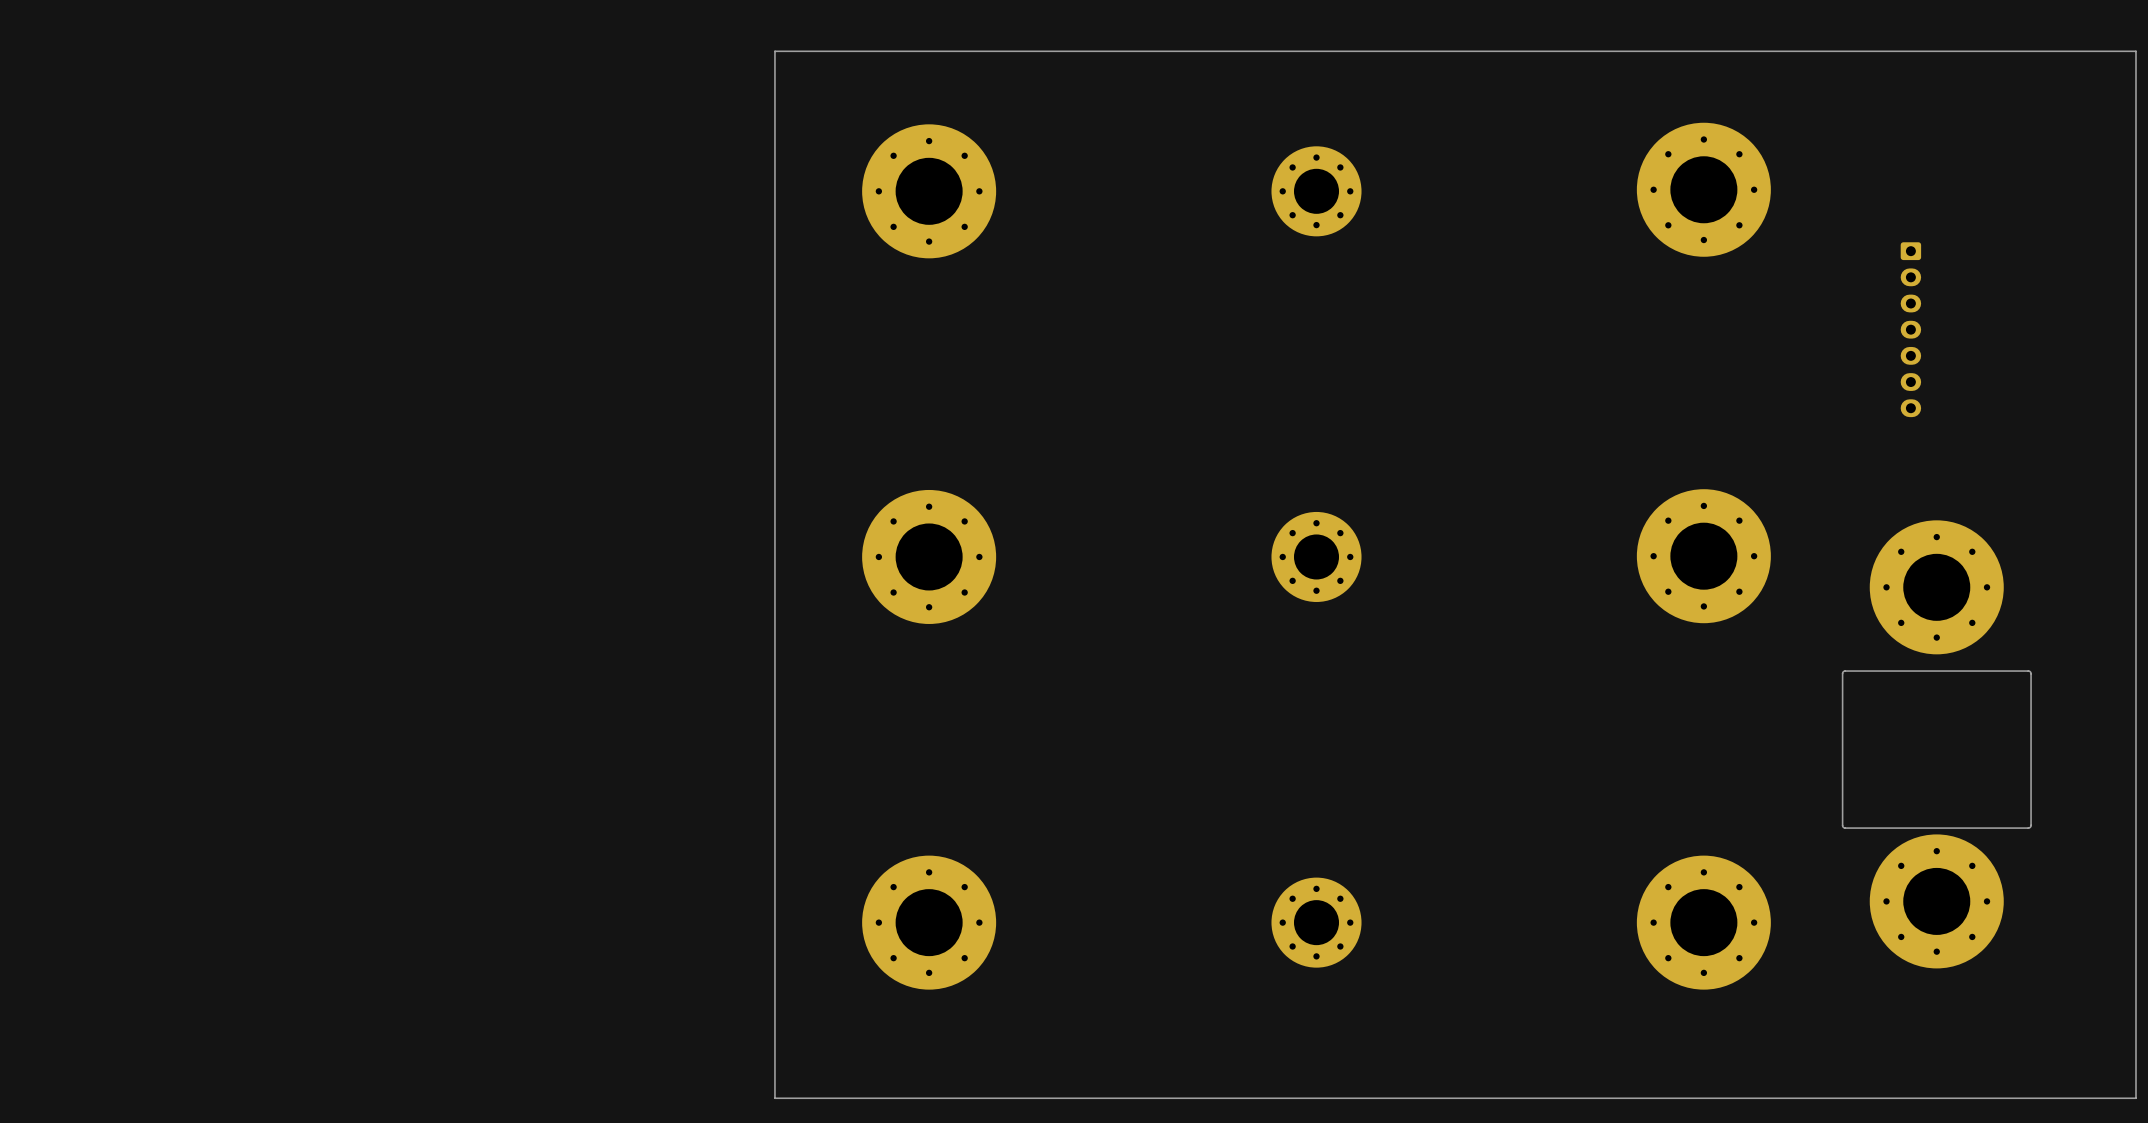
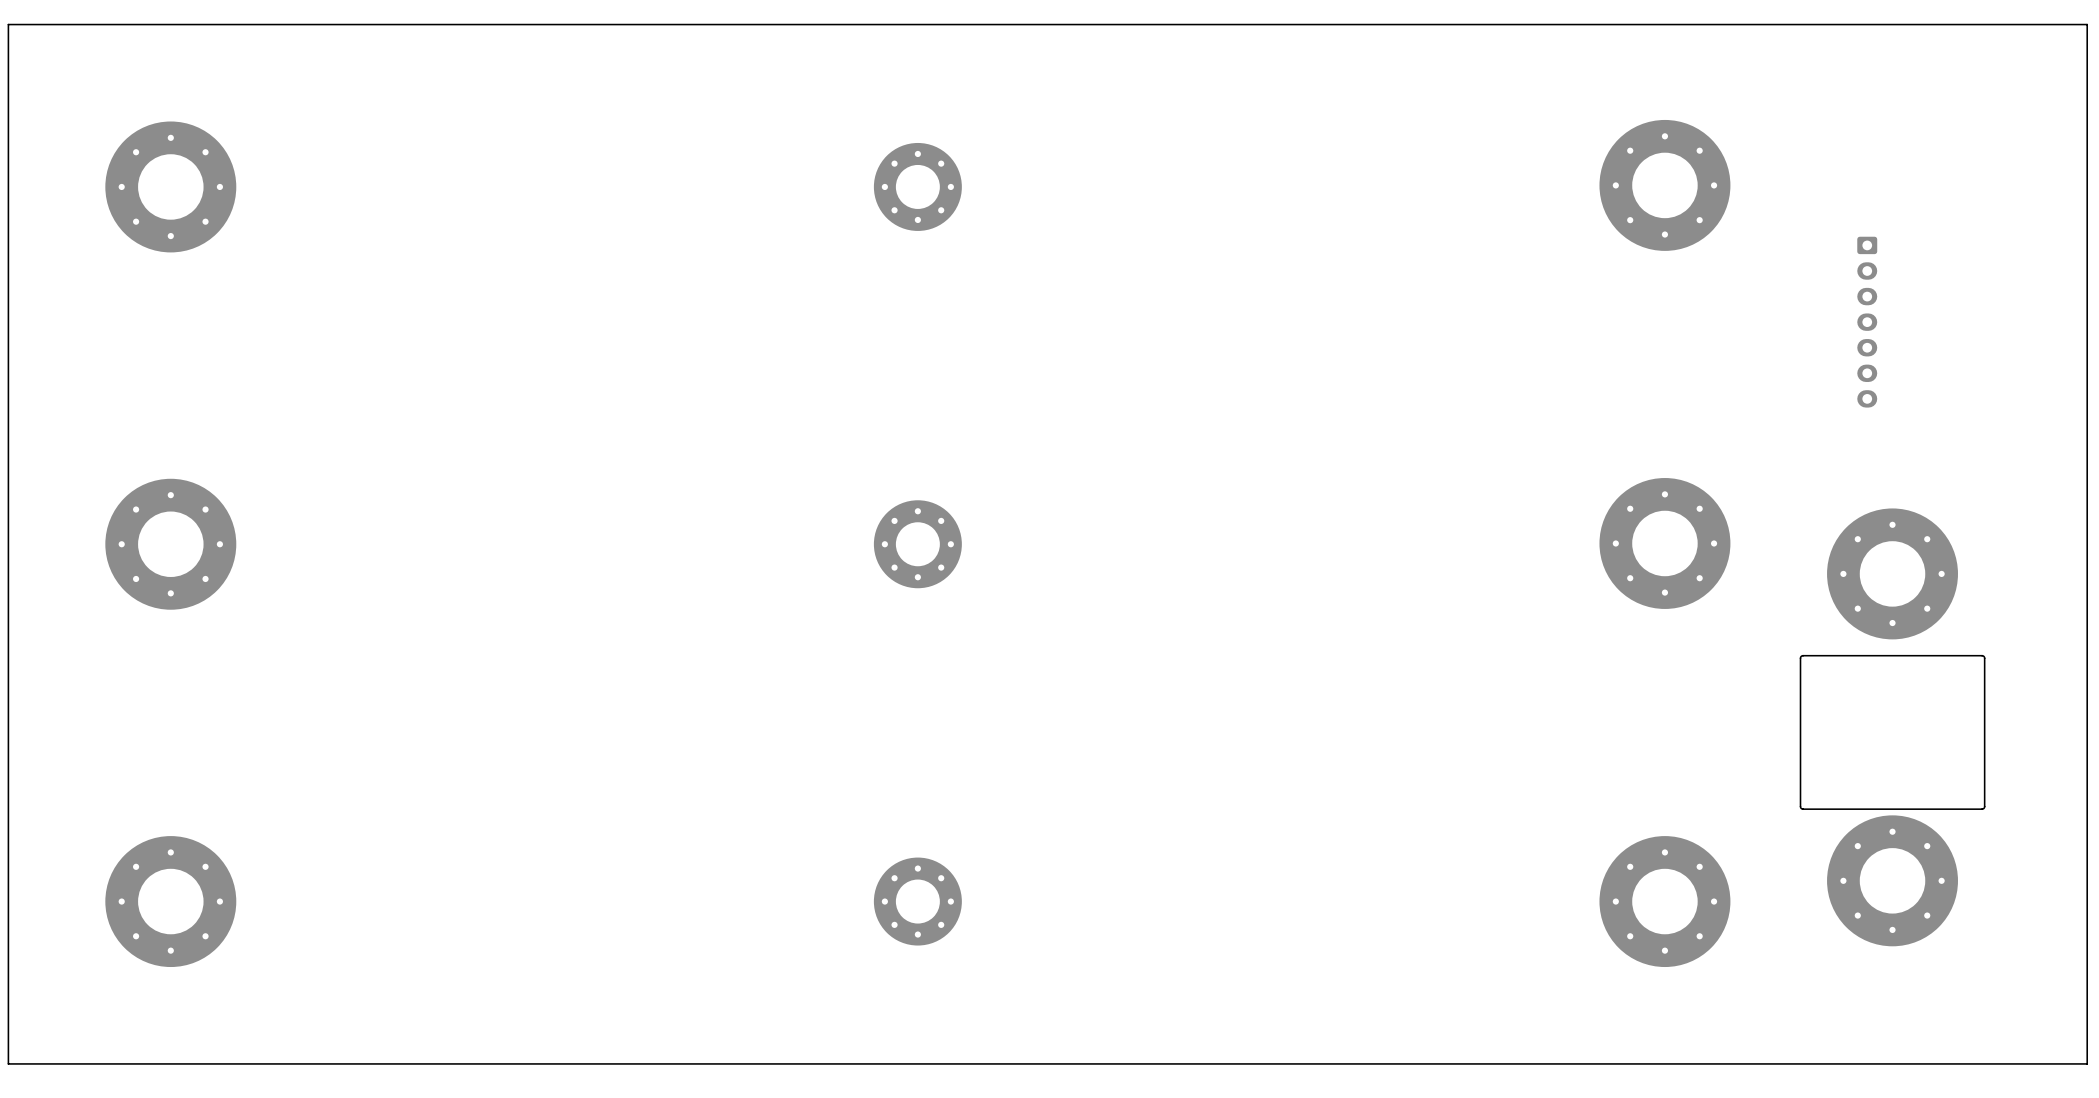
board edge: (2135, 51) (774, 51) (774, 1098) (2135, 1098) (2135, 1088) -> (2087, 50) (2087, 24) (8, 24) (8, 1063) (2087, 1063)
part footprint: [862, 124, 997, 259] -> [873, 142, 962, 231]
part: none -> (170, 186)
part: (1316, 191) -> none
part footprint: [862, 489, 997, 624] -> [873, 500, 962, 589]
part: none -> (170, 544)
part: (1316, 556) -> none
part footprint: [862, 855, 997, 990] -> [873, 857, 962, 946]
part: none -> (170, 901)
part: (1316, 922) -> none

